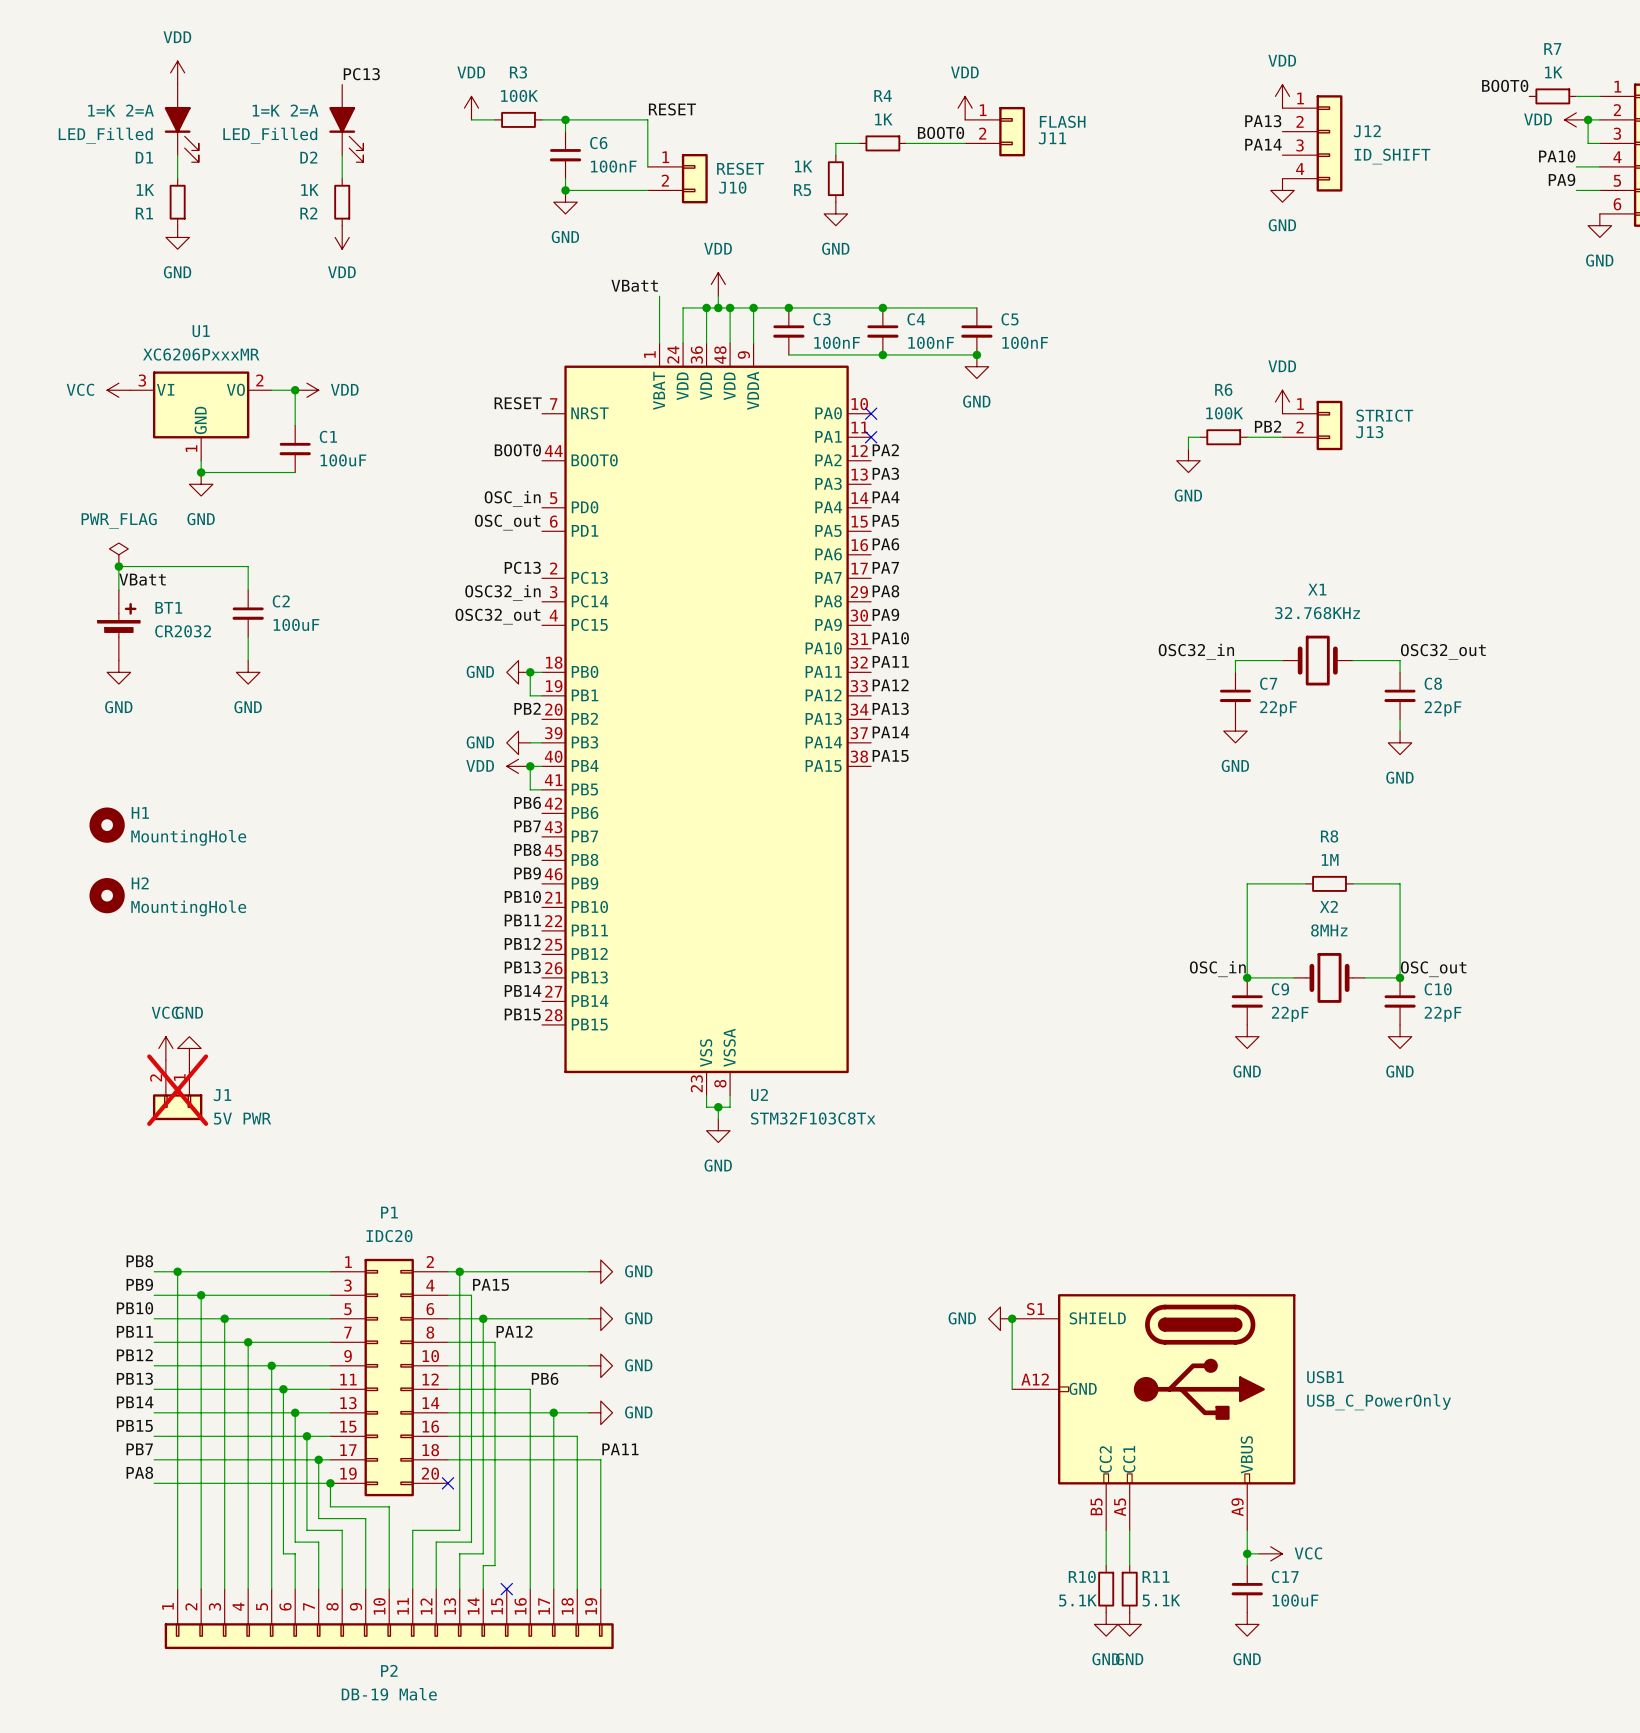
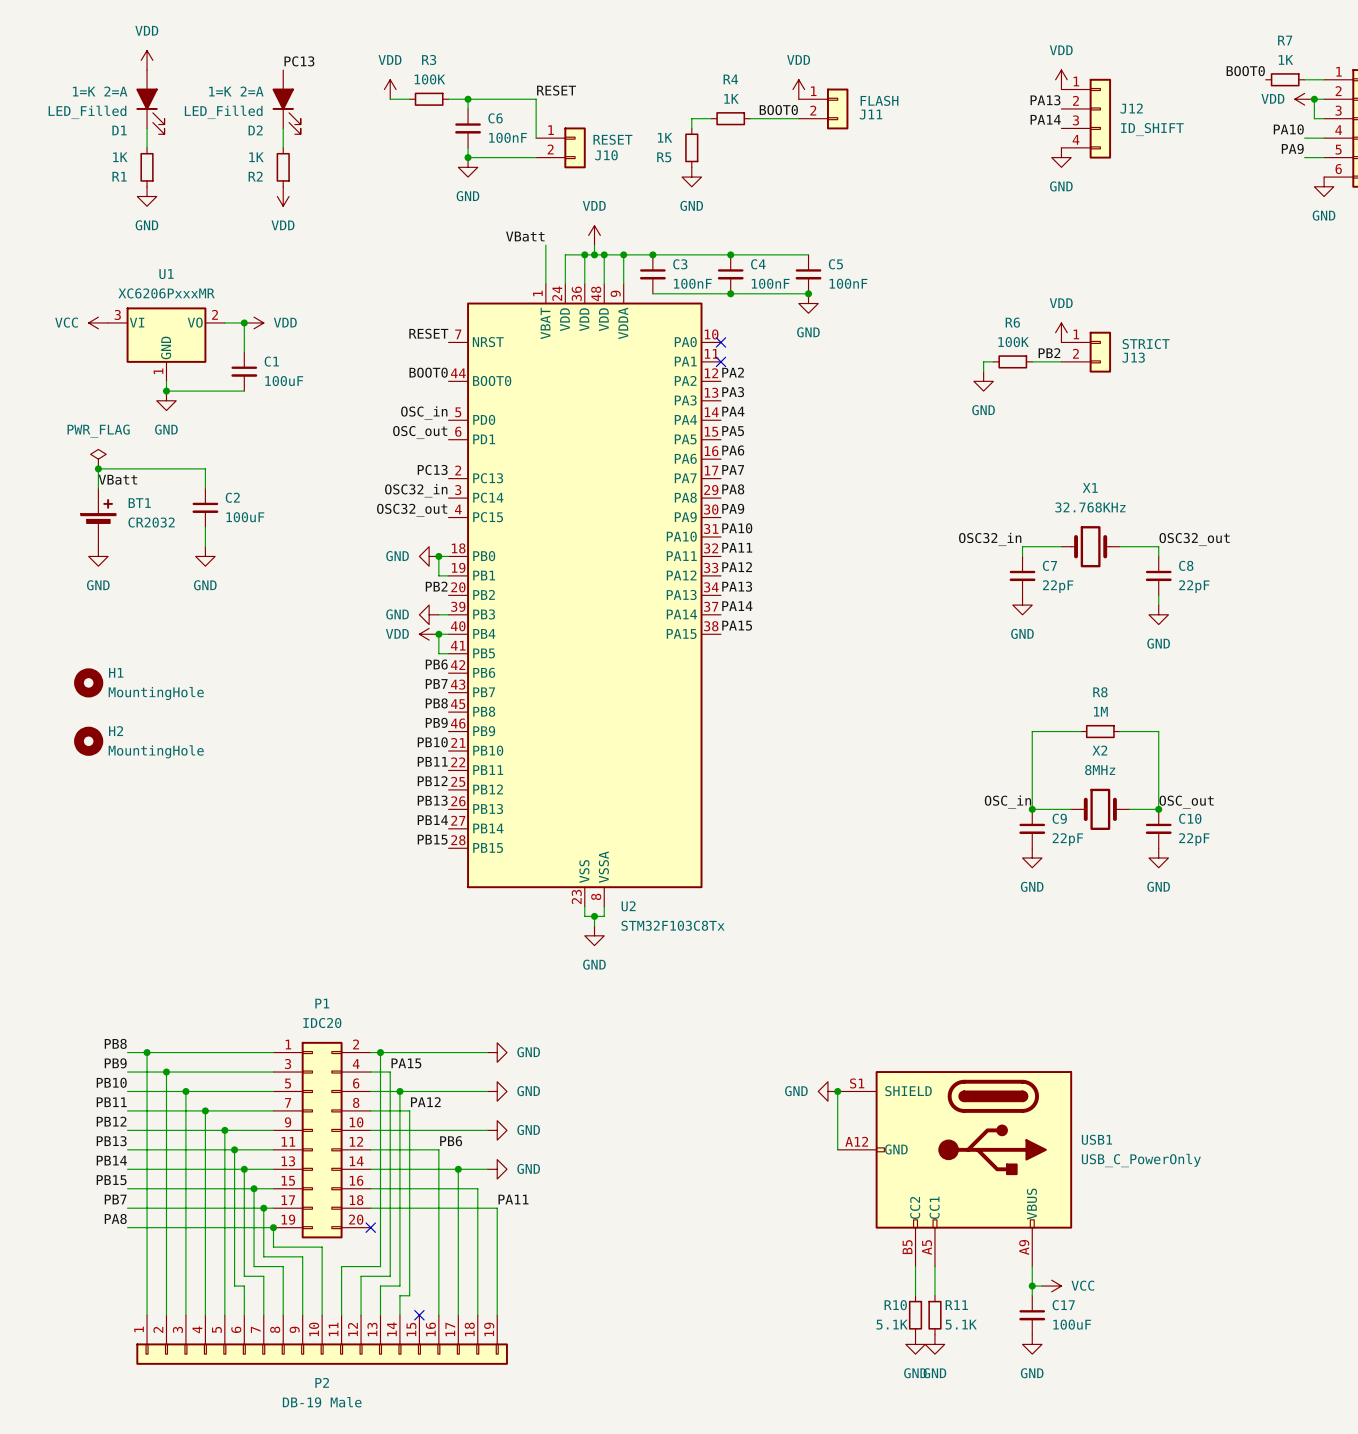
power symbol: VCC (165, 1048) -> none
power symbol: GND (189, 1048) -> none
J1: 5V PWR (177, 1090) -> none

